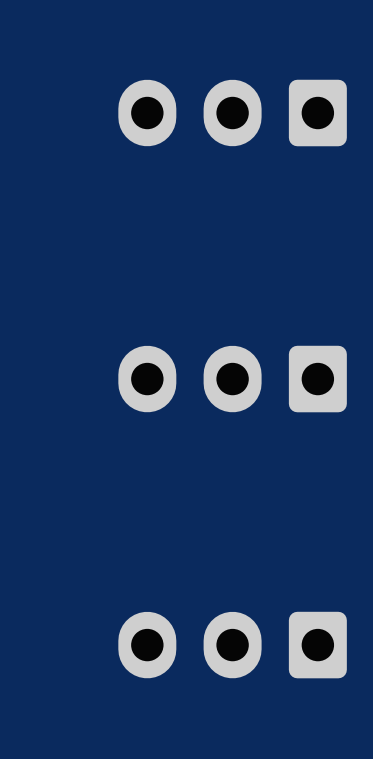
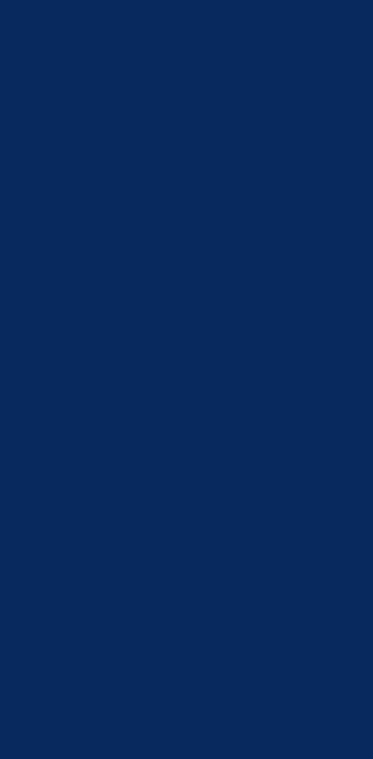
part: (232, 113) -> none
part: (232, 379) -> none
part: (232, 645) -> none

